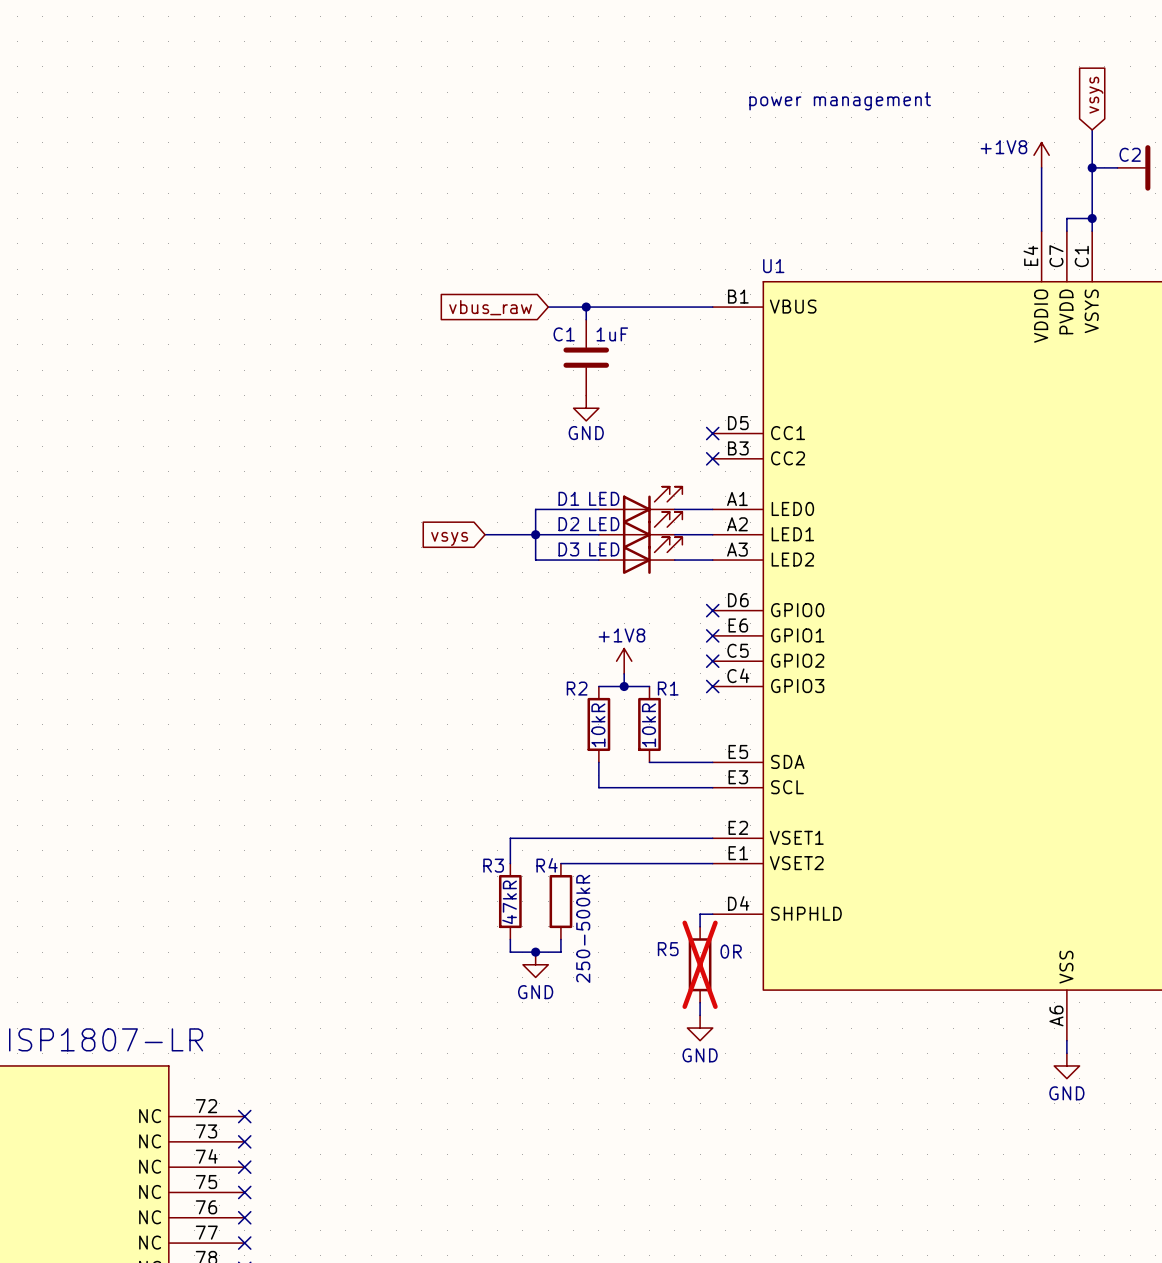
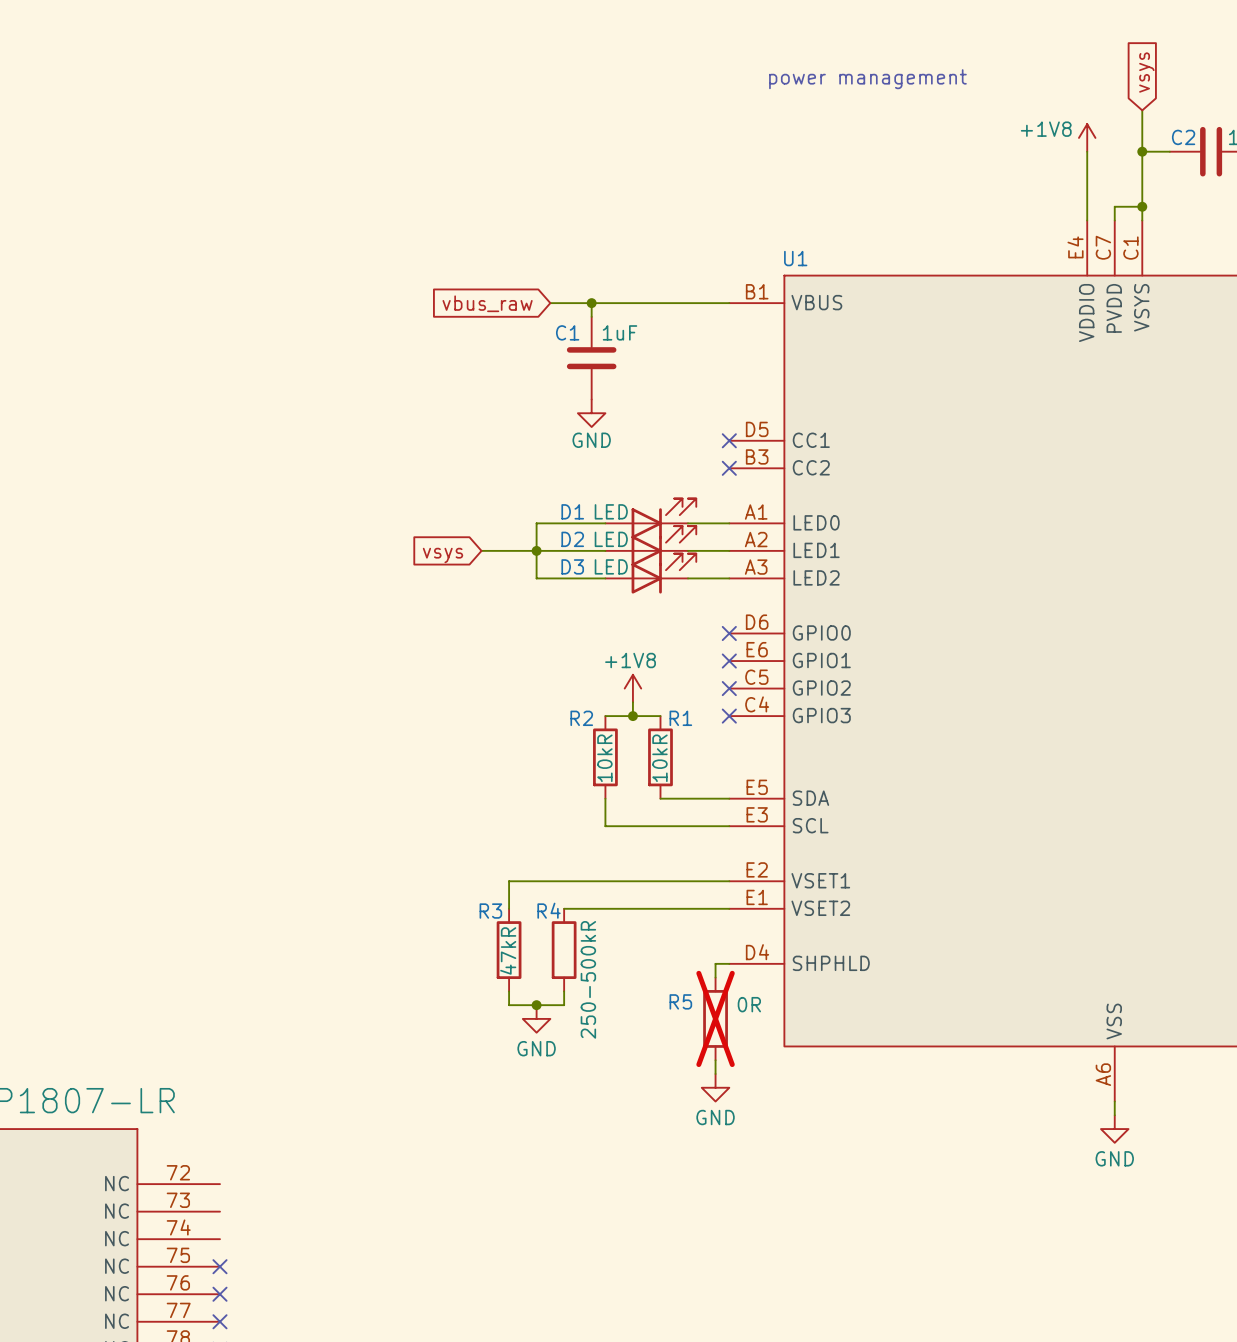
no-connect mark: (244, 1116) -> none
no-connect mark: (244, 1141) -> none
no-connect mark: (244, 1167) -> none

